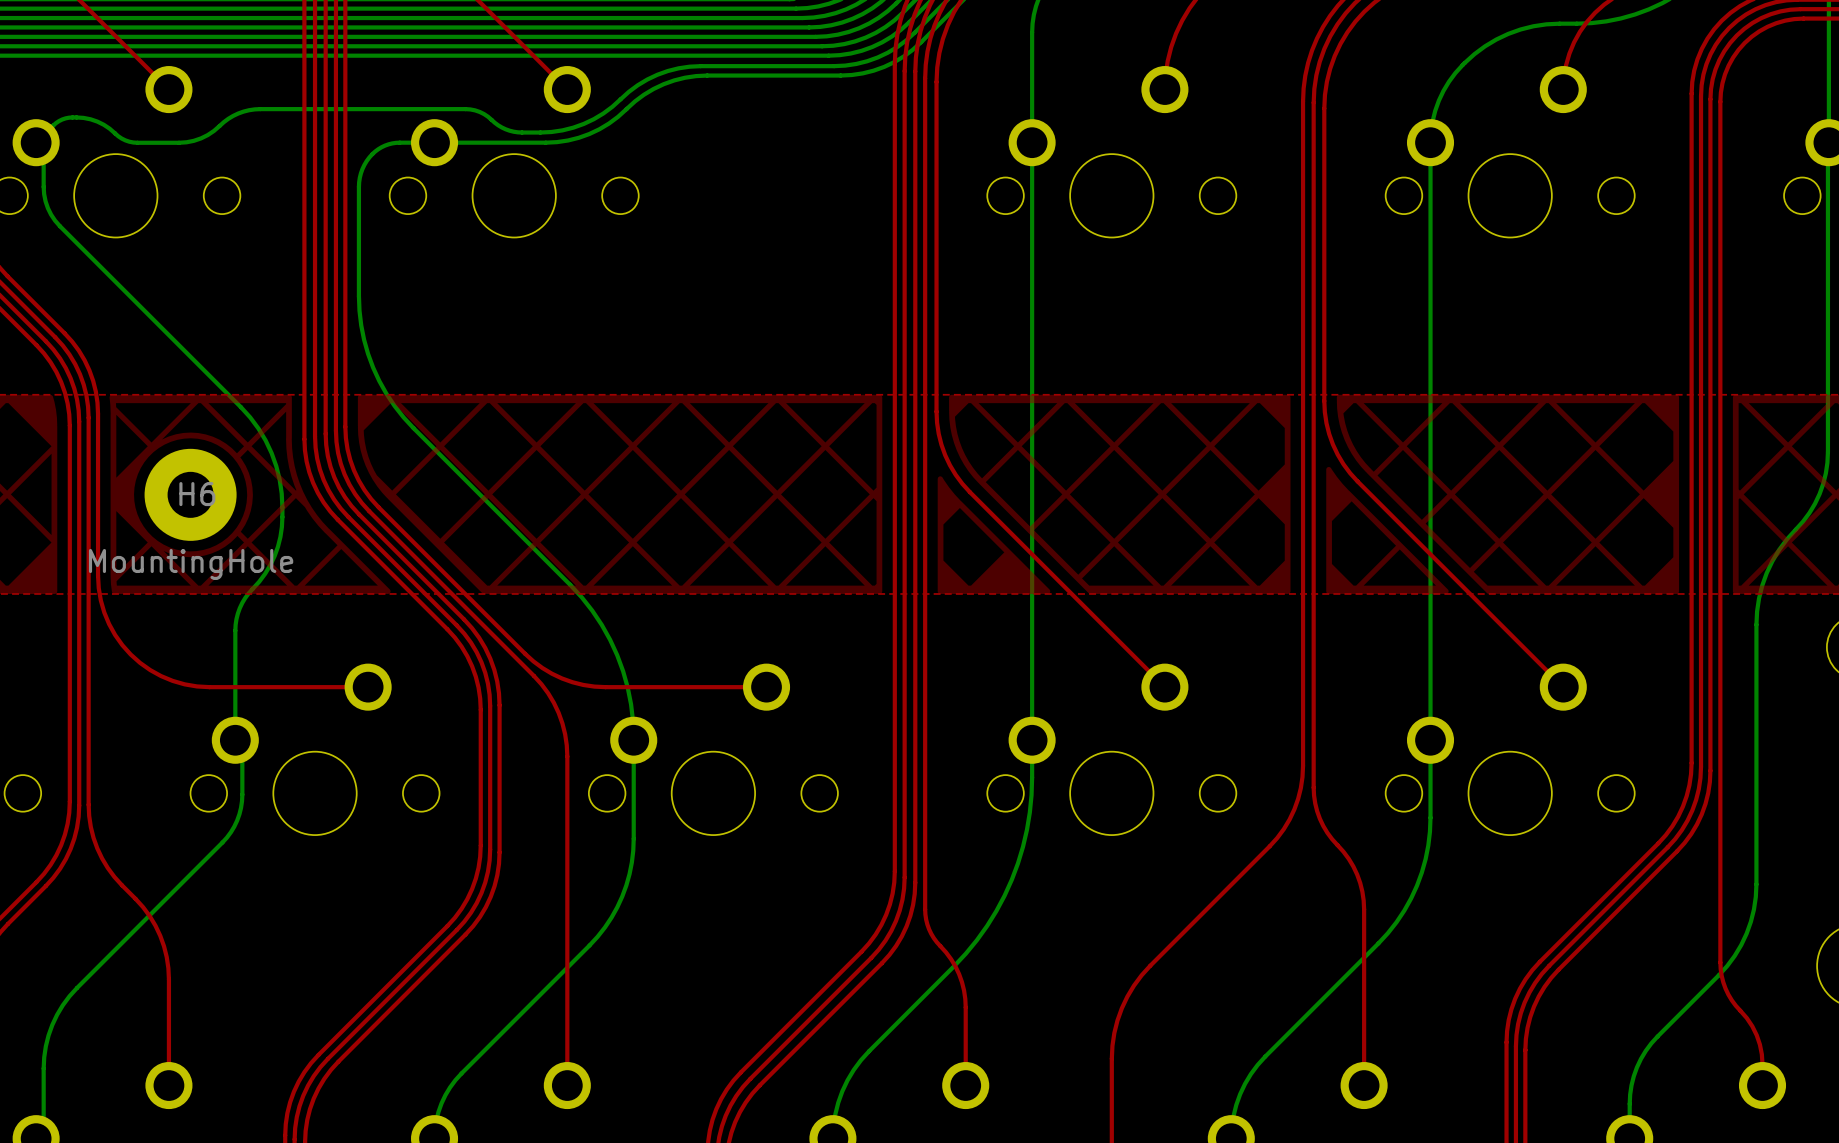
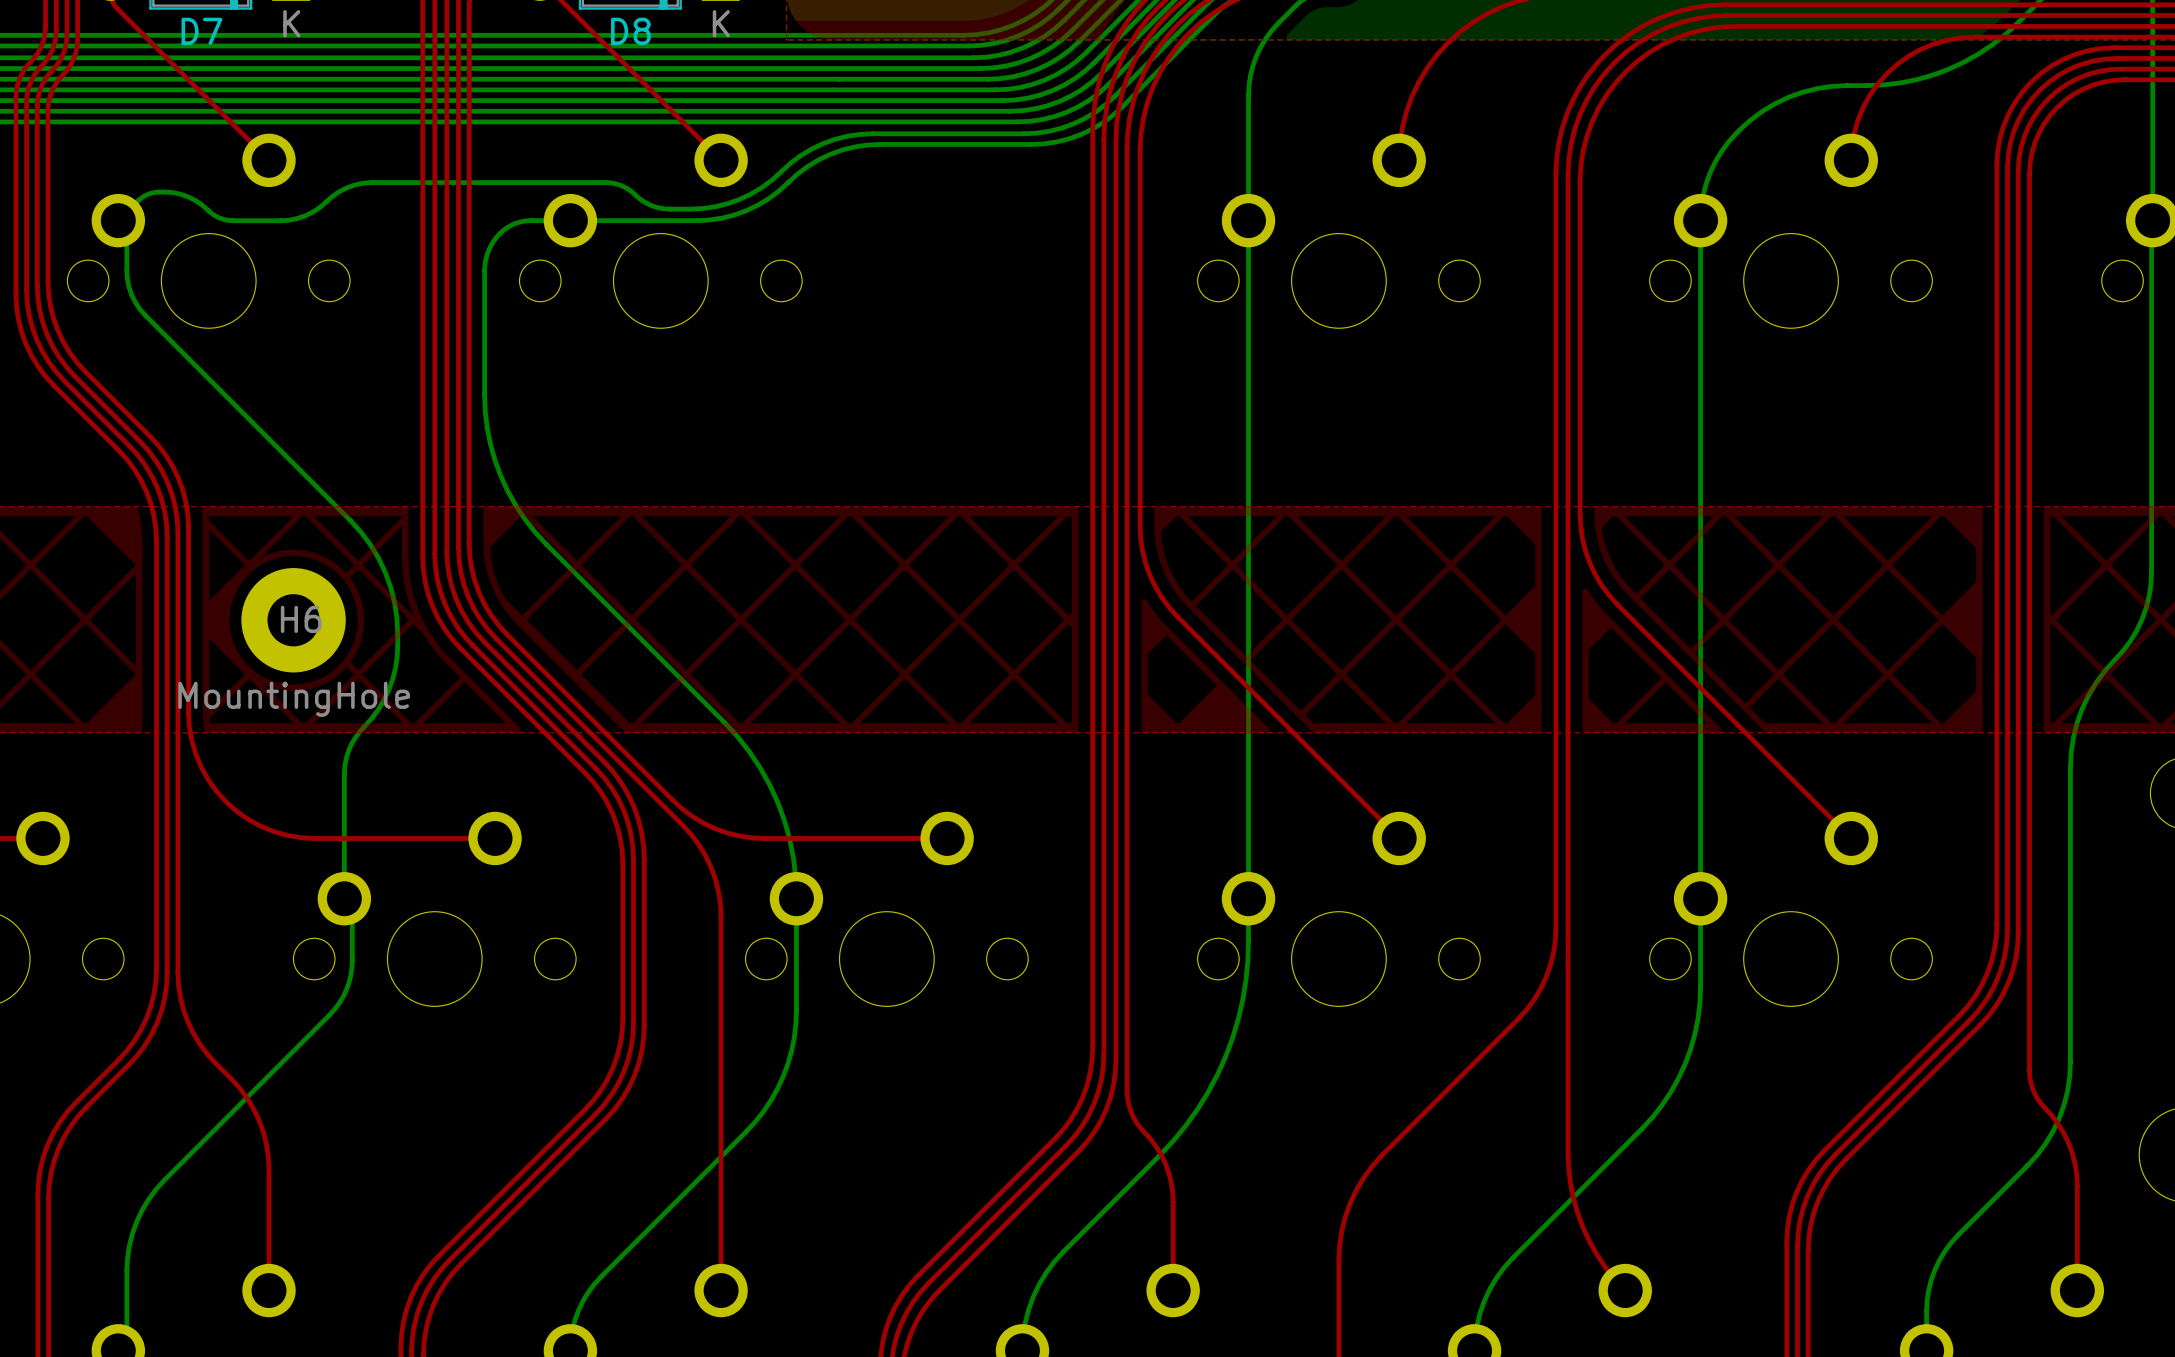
top track: (1313, 787) (1315, 803) (1319, 818) (1327, 832) (1353, 866) (1362, 891) (1364, 909) (1364, 1085) -> (1568, 952) (1568, 1152) (1570, 1182) (1577, 1212) (1589, 1241) (1605, 1267) (1625, 1290)
top track: (1720, 891) (1721, 975) (1728, 994) (1746, 1018) (1756, 1035) (1762, 1064) -> (2029, 1070) (2030, 1080) (2035, 1095) (2064, 1134) (2075, 1164) (2077, 1186) (2077, 1266)

